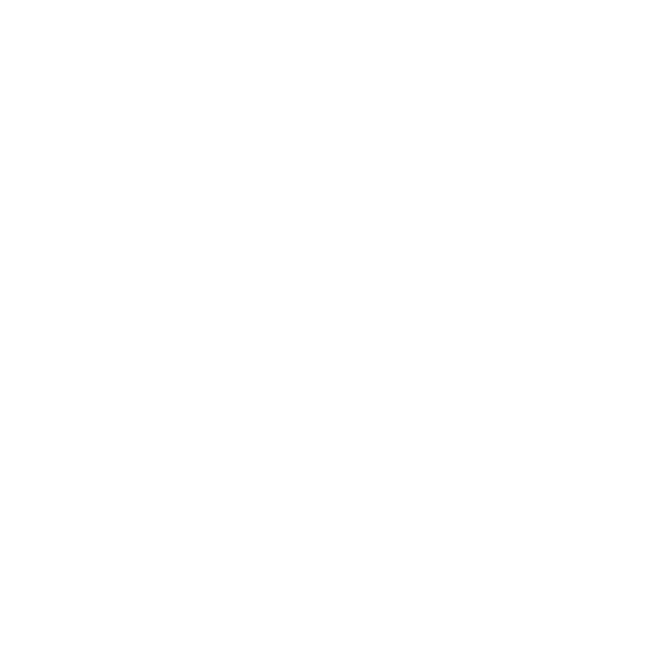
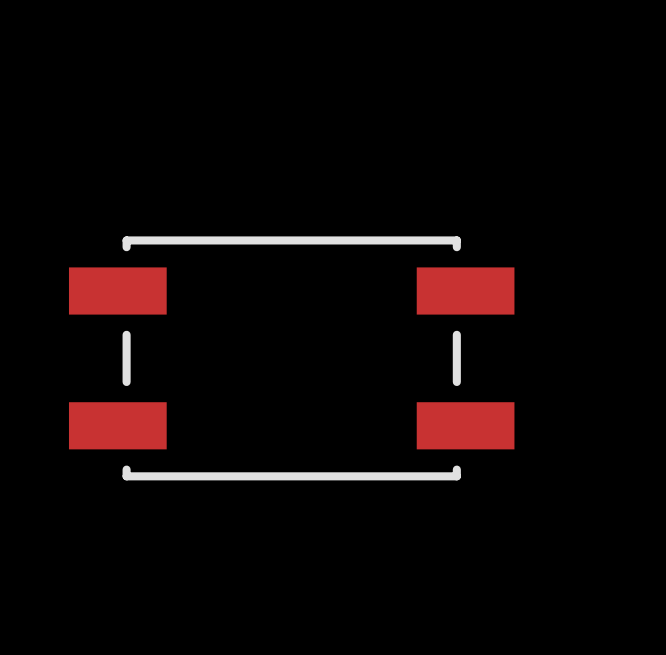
part: none -> (291, 358)

